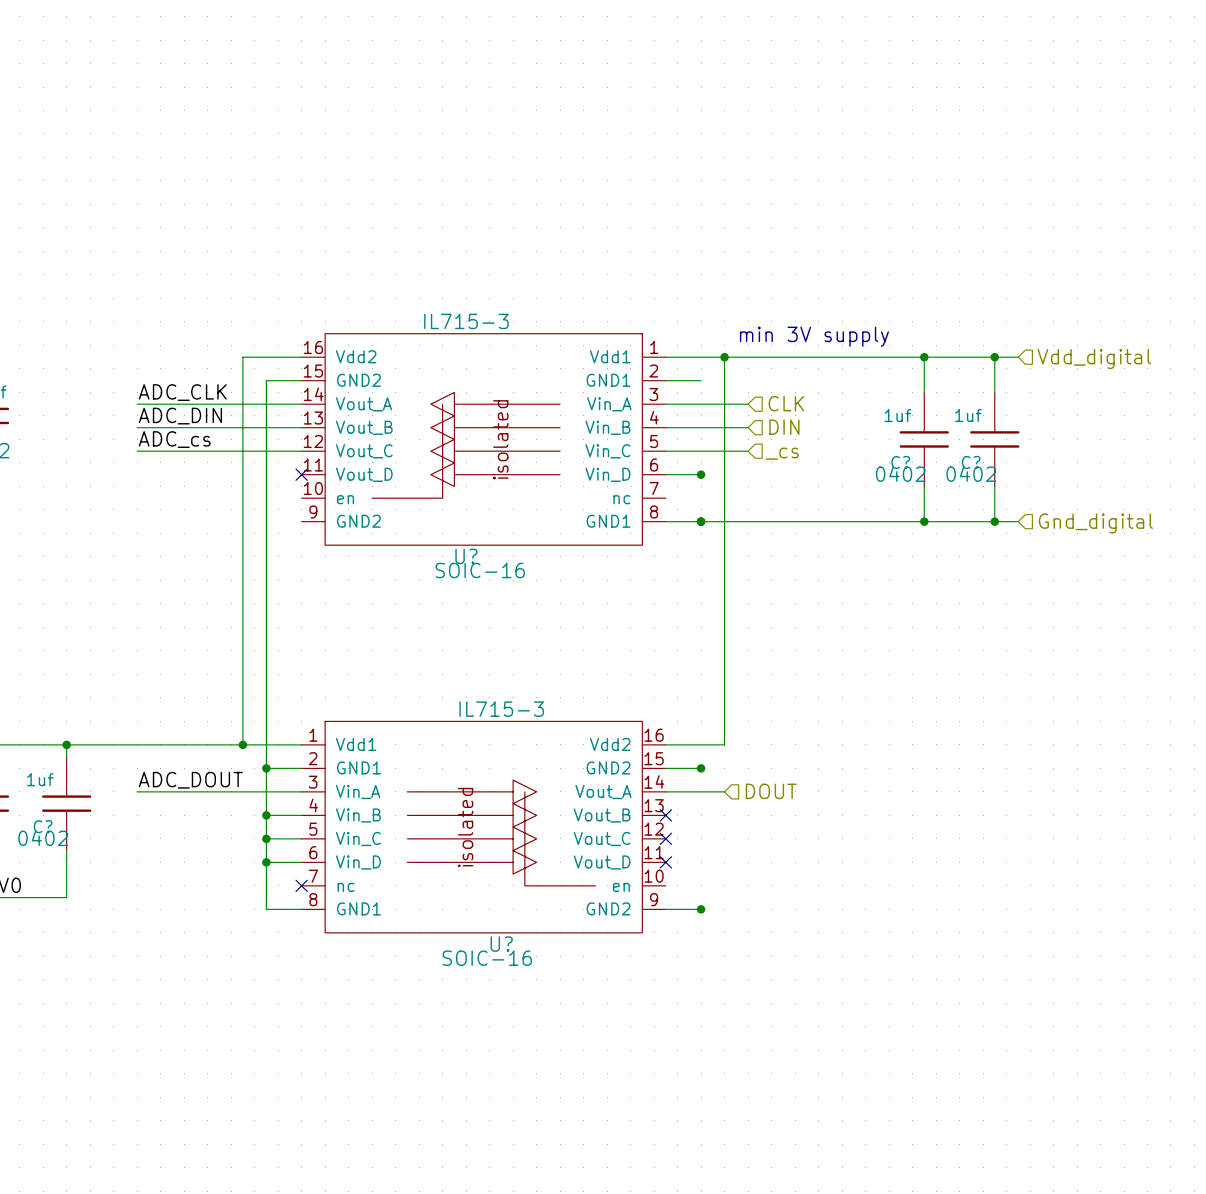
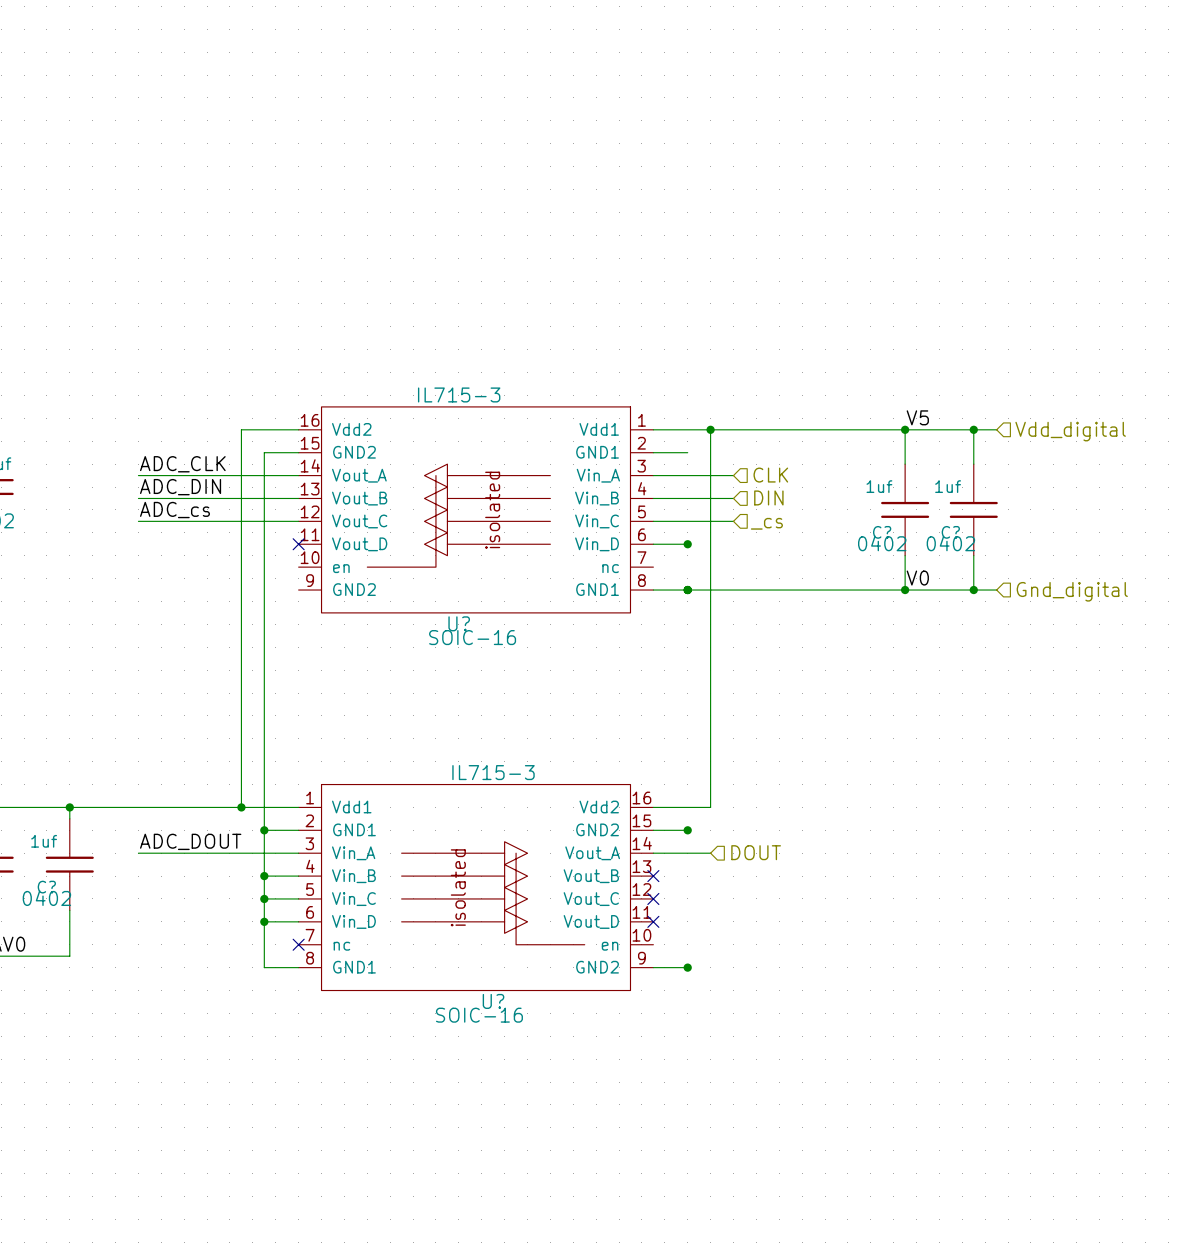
text: min 3V supply (814, 336) -> none
label: none -> V5 (917, 417)
label: none -> V0 (917, 578)

